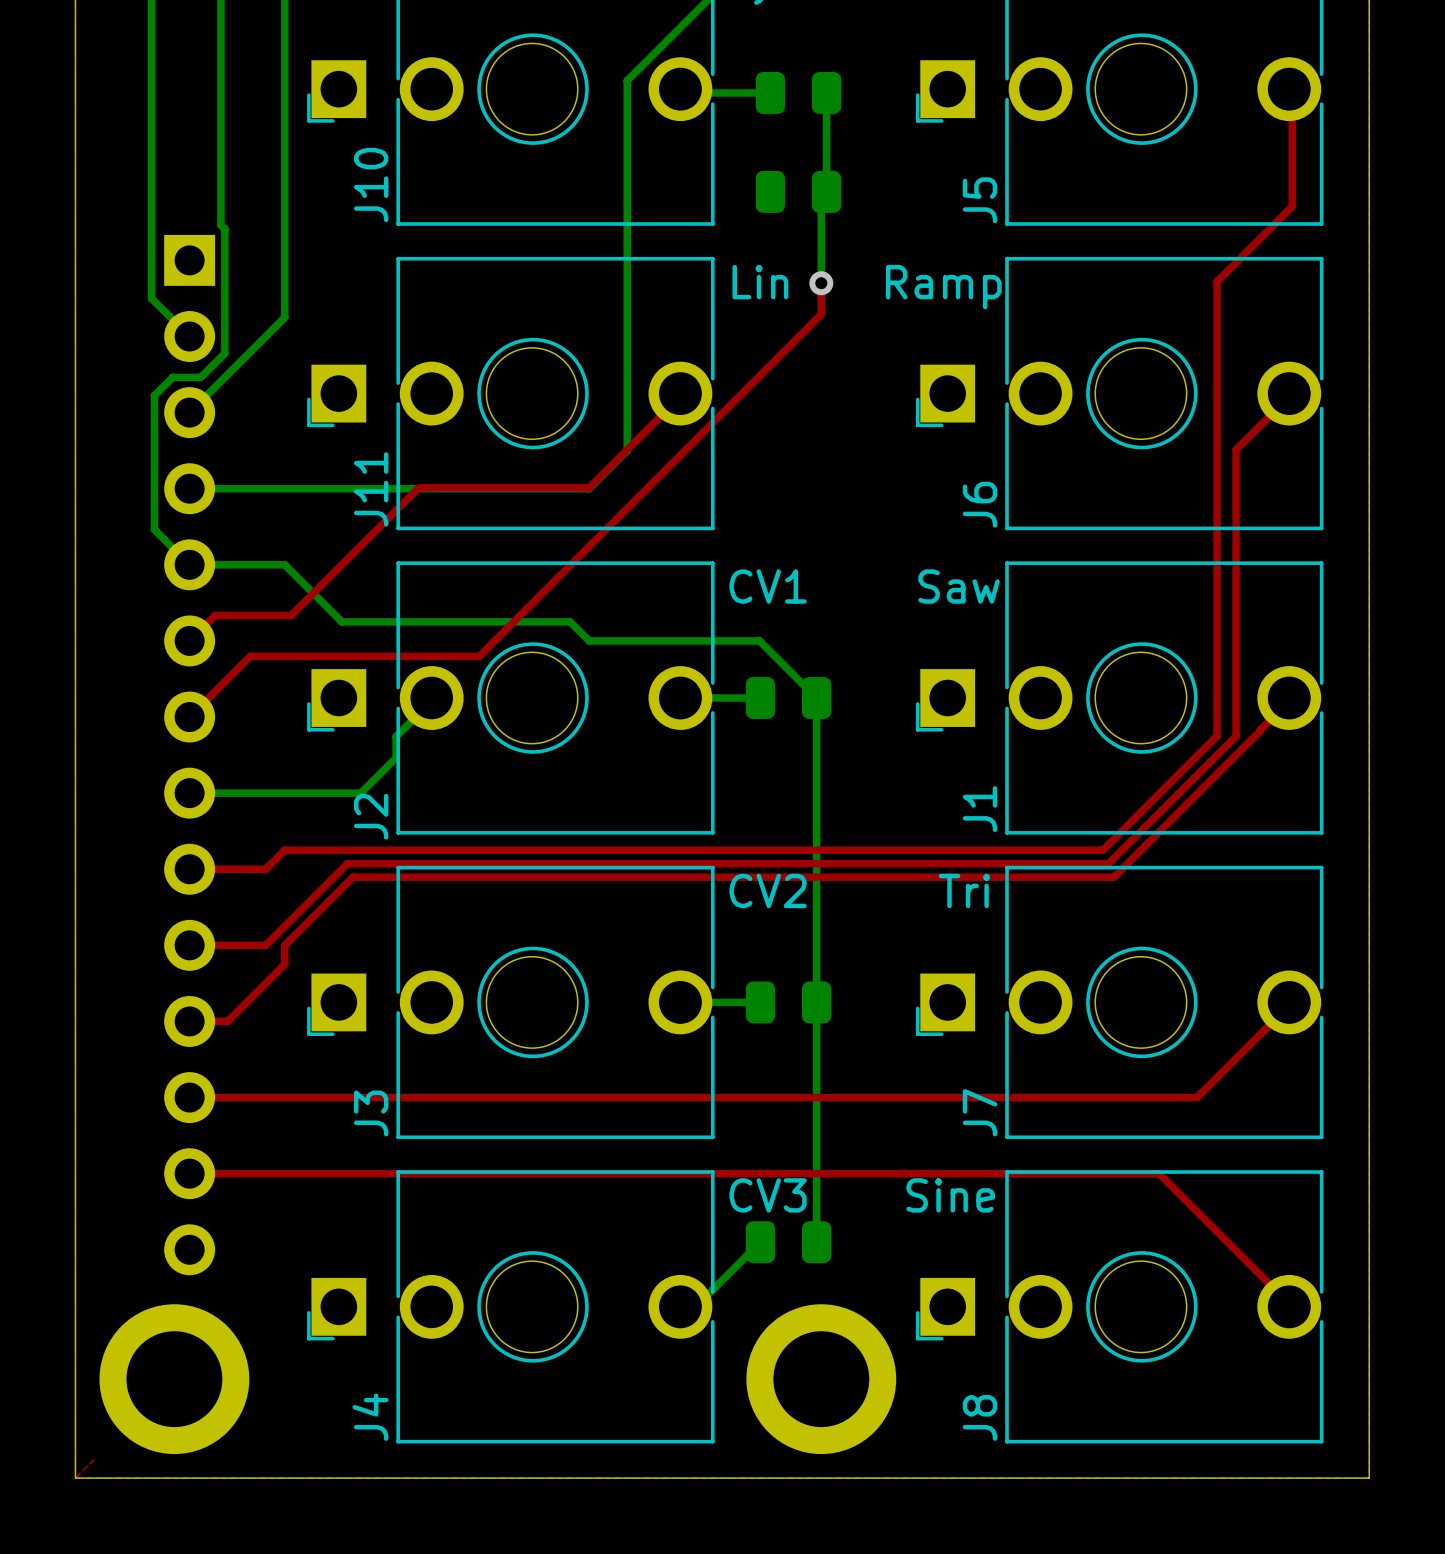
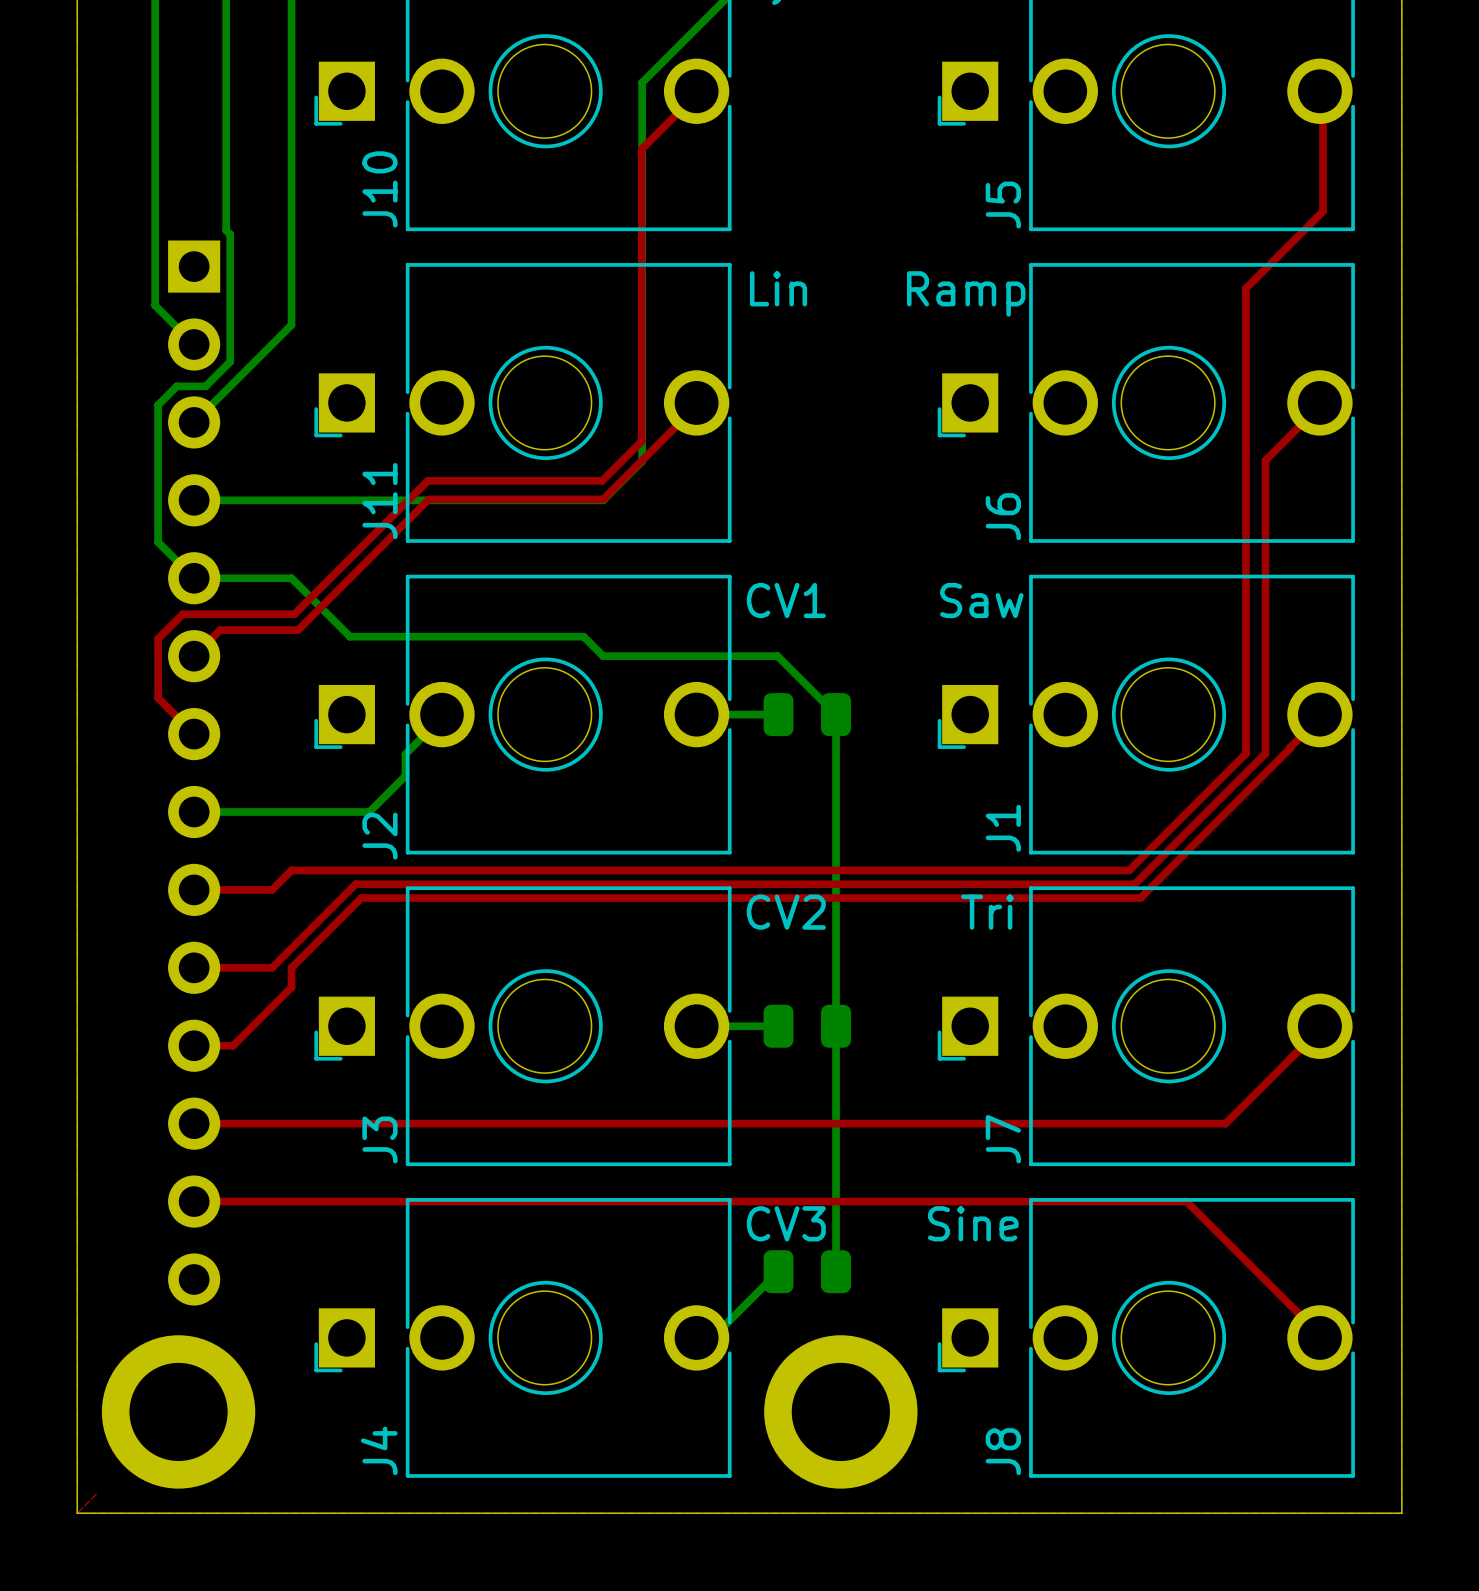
bottom track: (680, 89) (684, 92) (770, 92) -> none
part: (798, 92) -> none
bottom track: (826, 92) (826, 191) (821, 197) (821, 283) -> none
part: (798, 191) -> none
top track: (821, 283) (821, 314) (479, 656) (250, 656) (189, 717) -> (699, 91) (641, 149) (641, 441) (602, 480) (427, 480) (294, 614) (182, 614) (158, 638) (158, 698) (194, 734)
via: (821, 283) -> none

